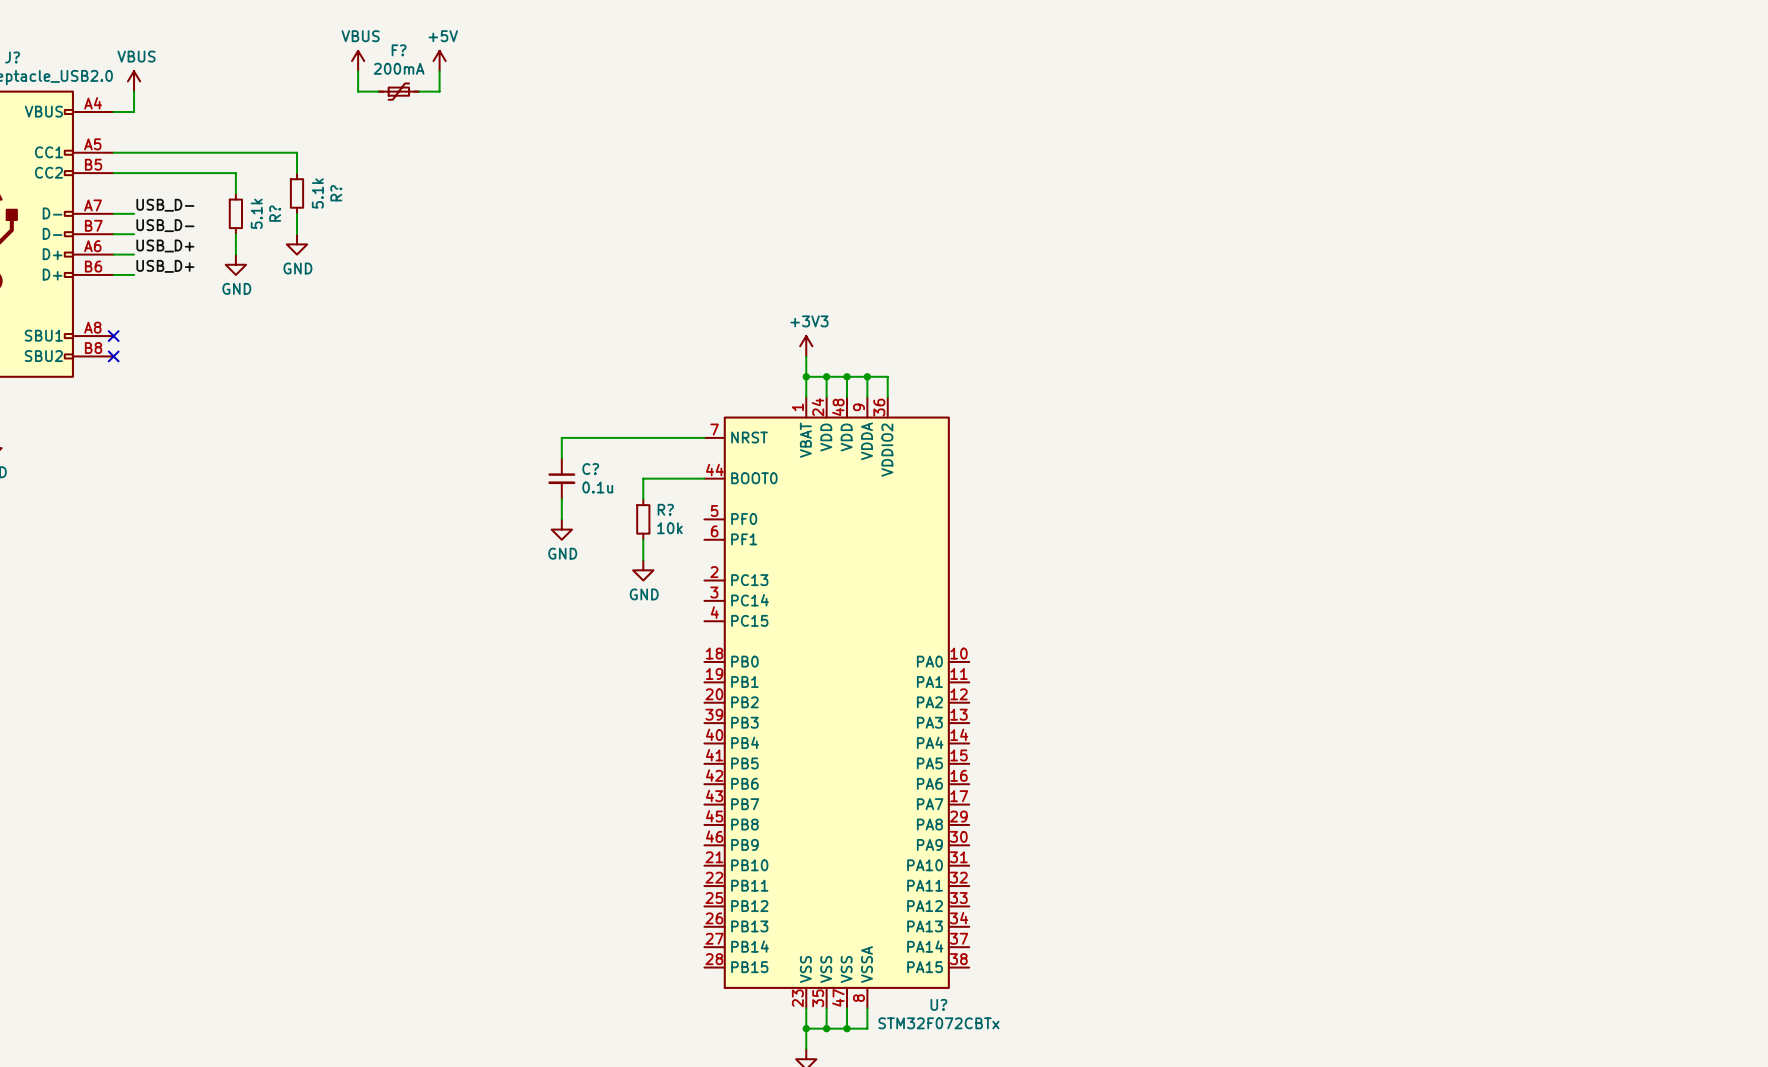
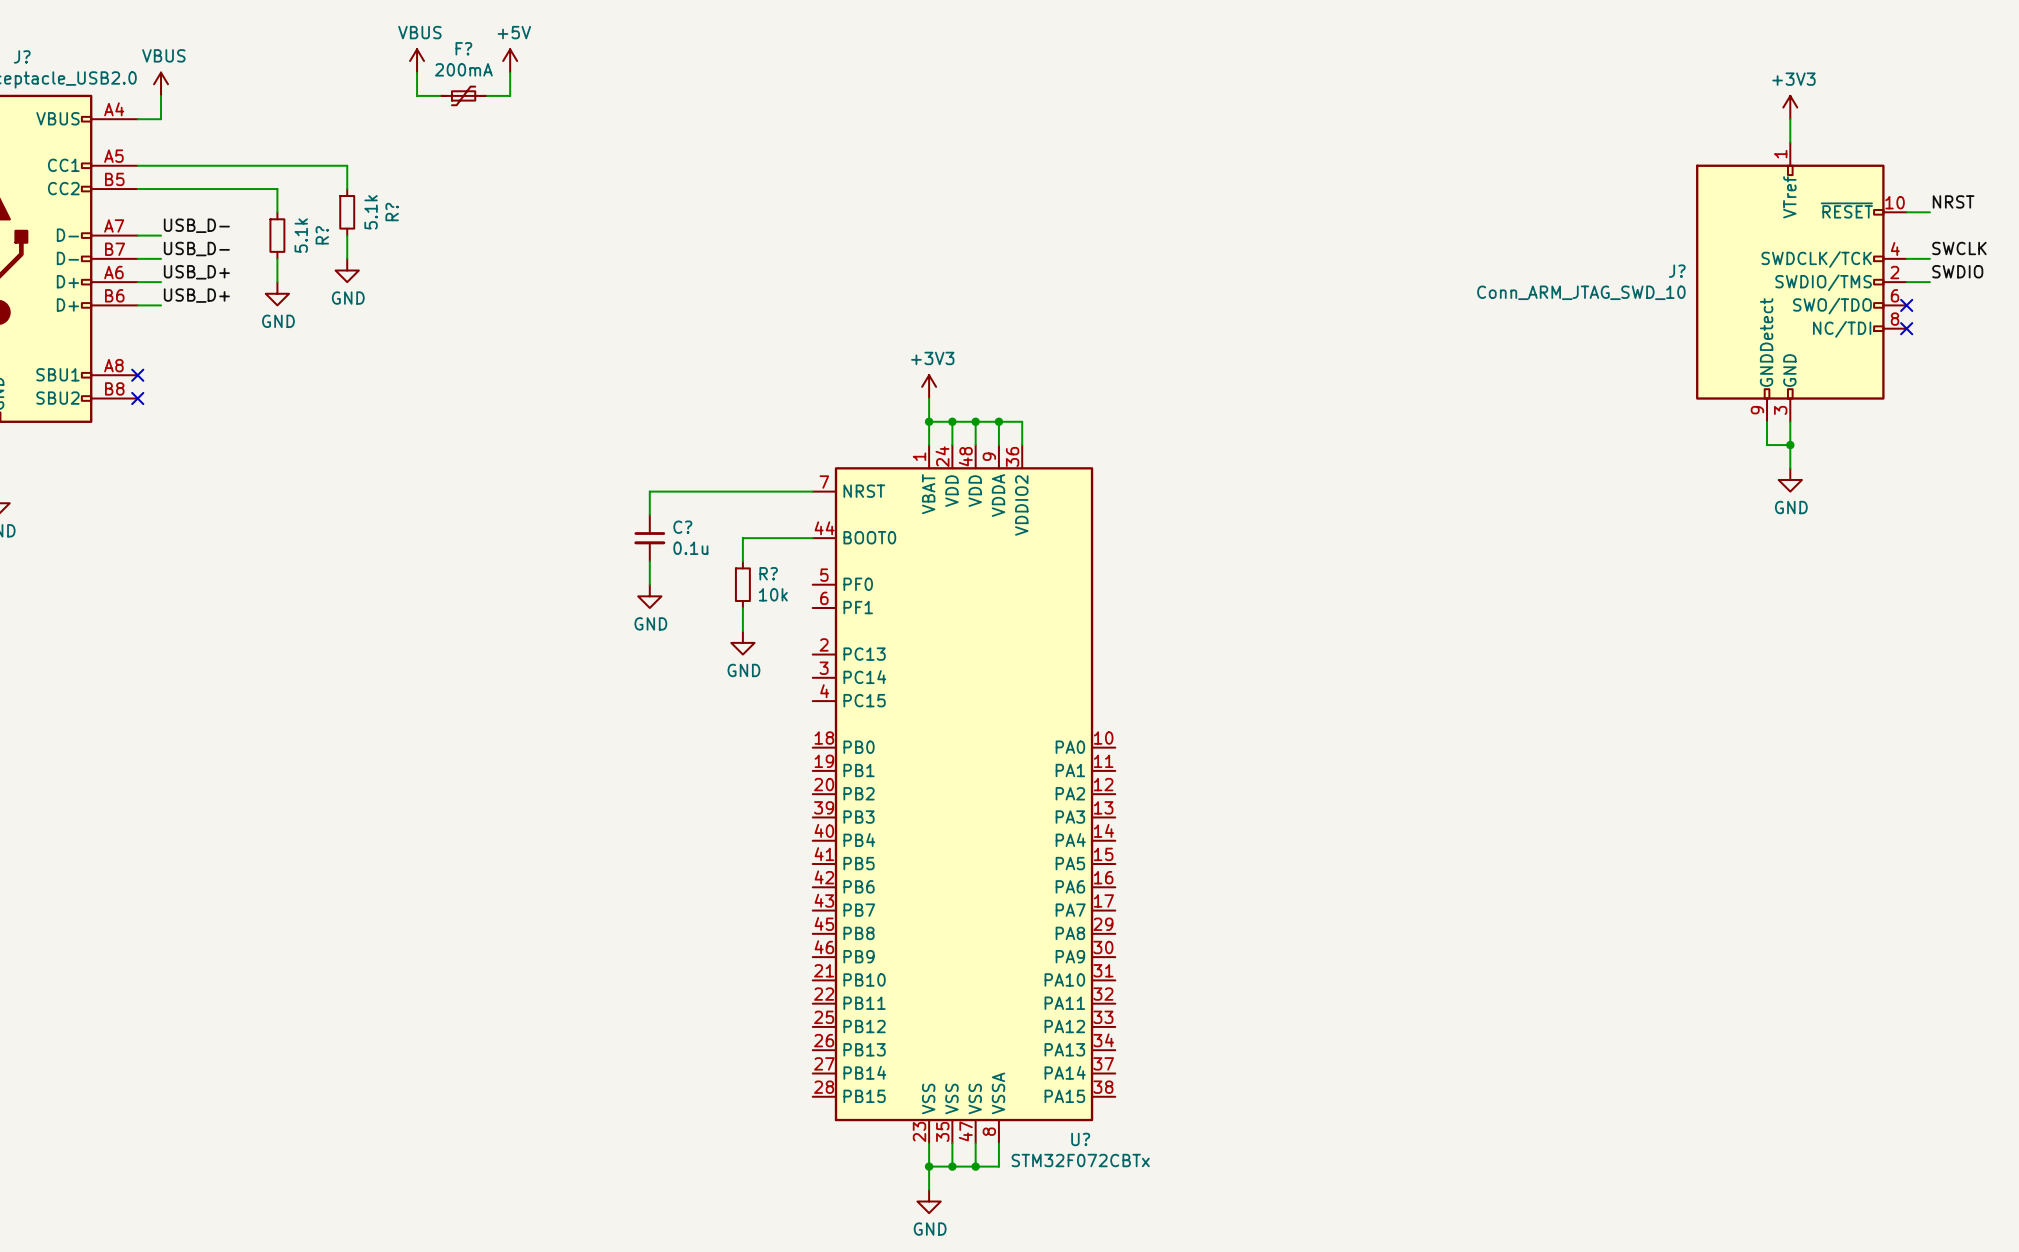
power symbol: none -> +3V3 (1790, 107)
wire: none -> (1790, 119) (1790, 142)
label: none -> NRST (1953, 201)
wire: none -> (1906, 212) (1929, 212)
label: none -> SWCLK (1959, 248)
wire: none -> (1906, 258) (1929, 258)
label: none -> SWDIO (1957, 271)
J?: none -> Conn_ARM_JTAG_SWD_10 (1801, 282)
wire: none -> (1906, 282) (1929, 282)
no-connect mark: none -> (1906, 305)
no-connect mark: none -> (1906, 328)
wire: none -> (1767, 421) (1767, 445) (1790, 445)
wire: none -> (1790, 421) (1790, 468)
junction: none -> (1790, 445)
power symbol: none -> GND (1790, 479)

